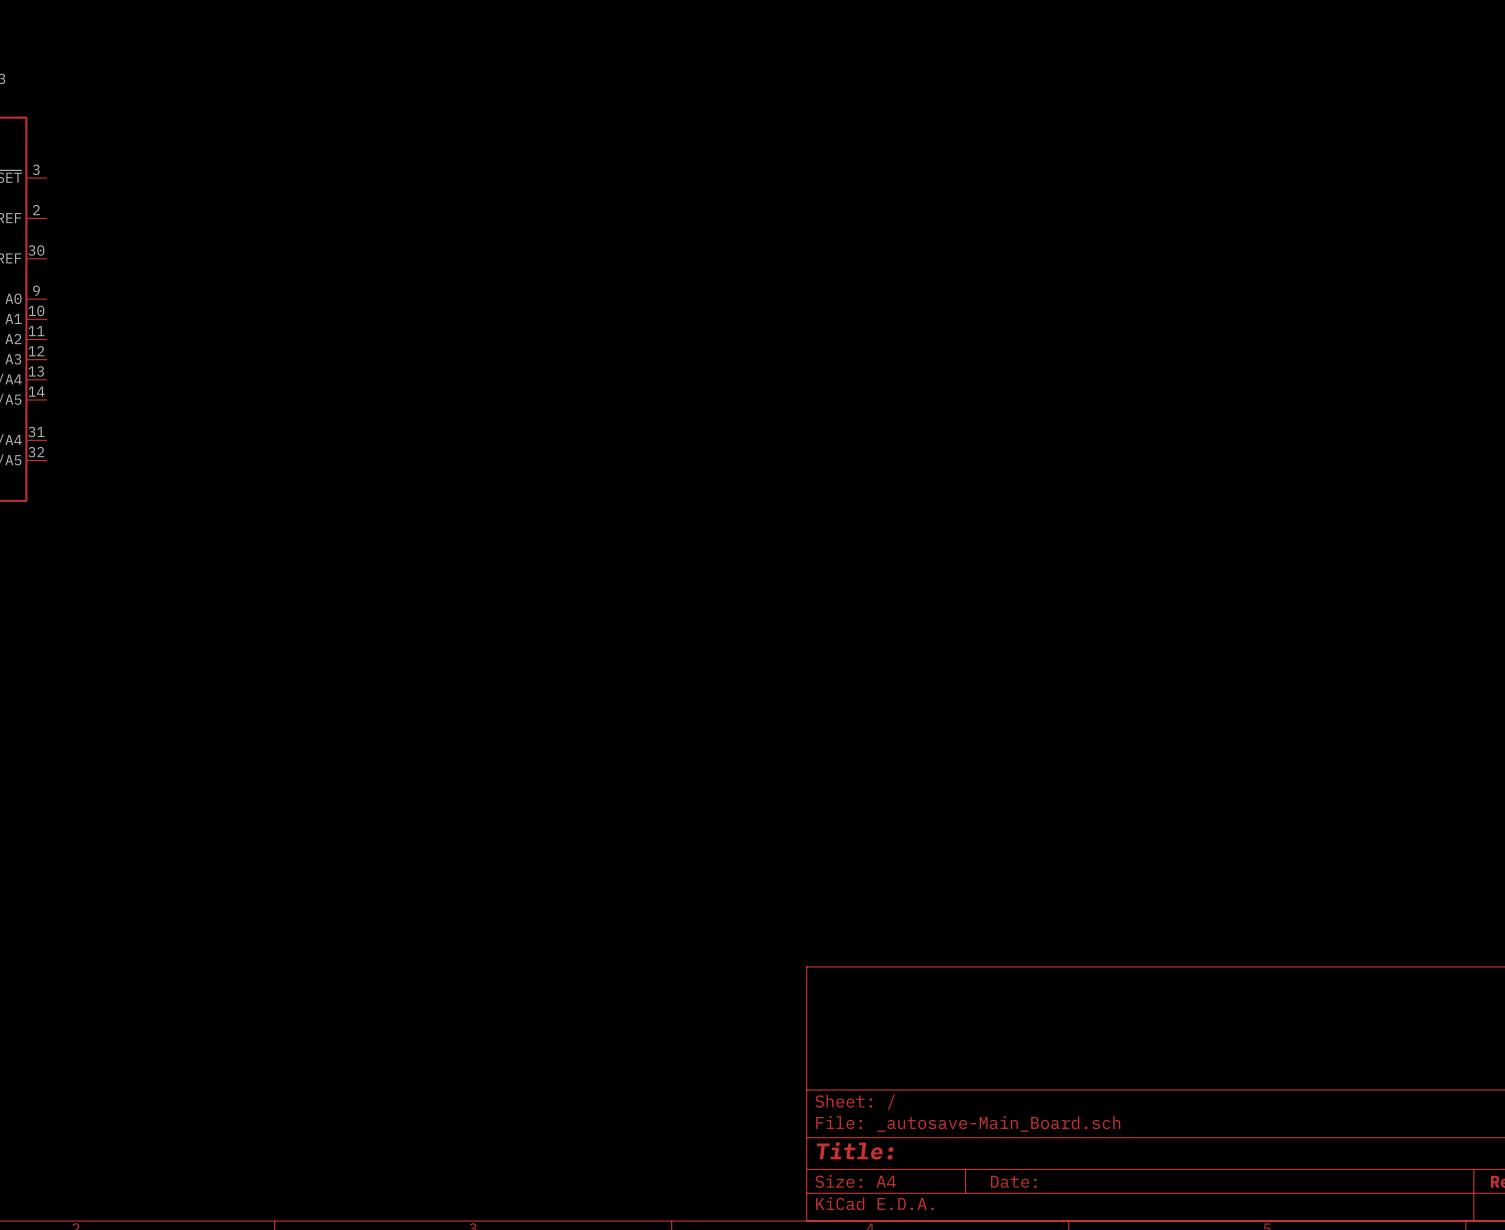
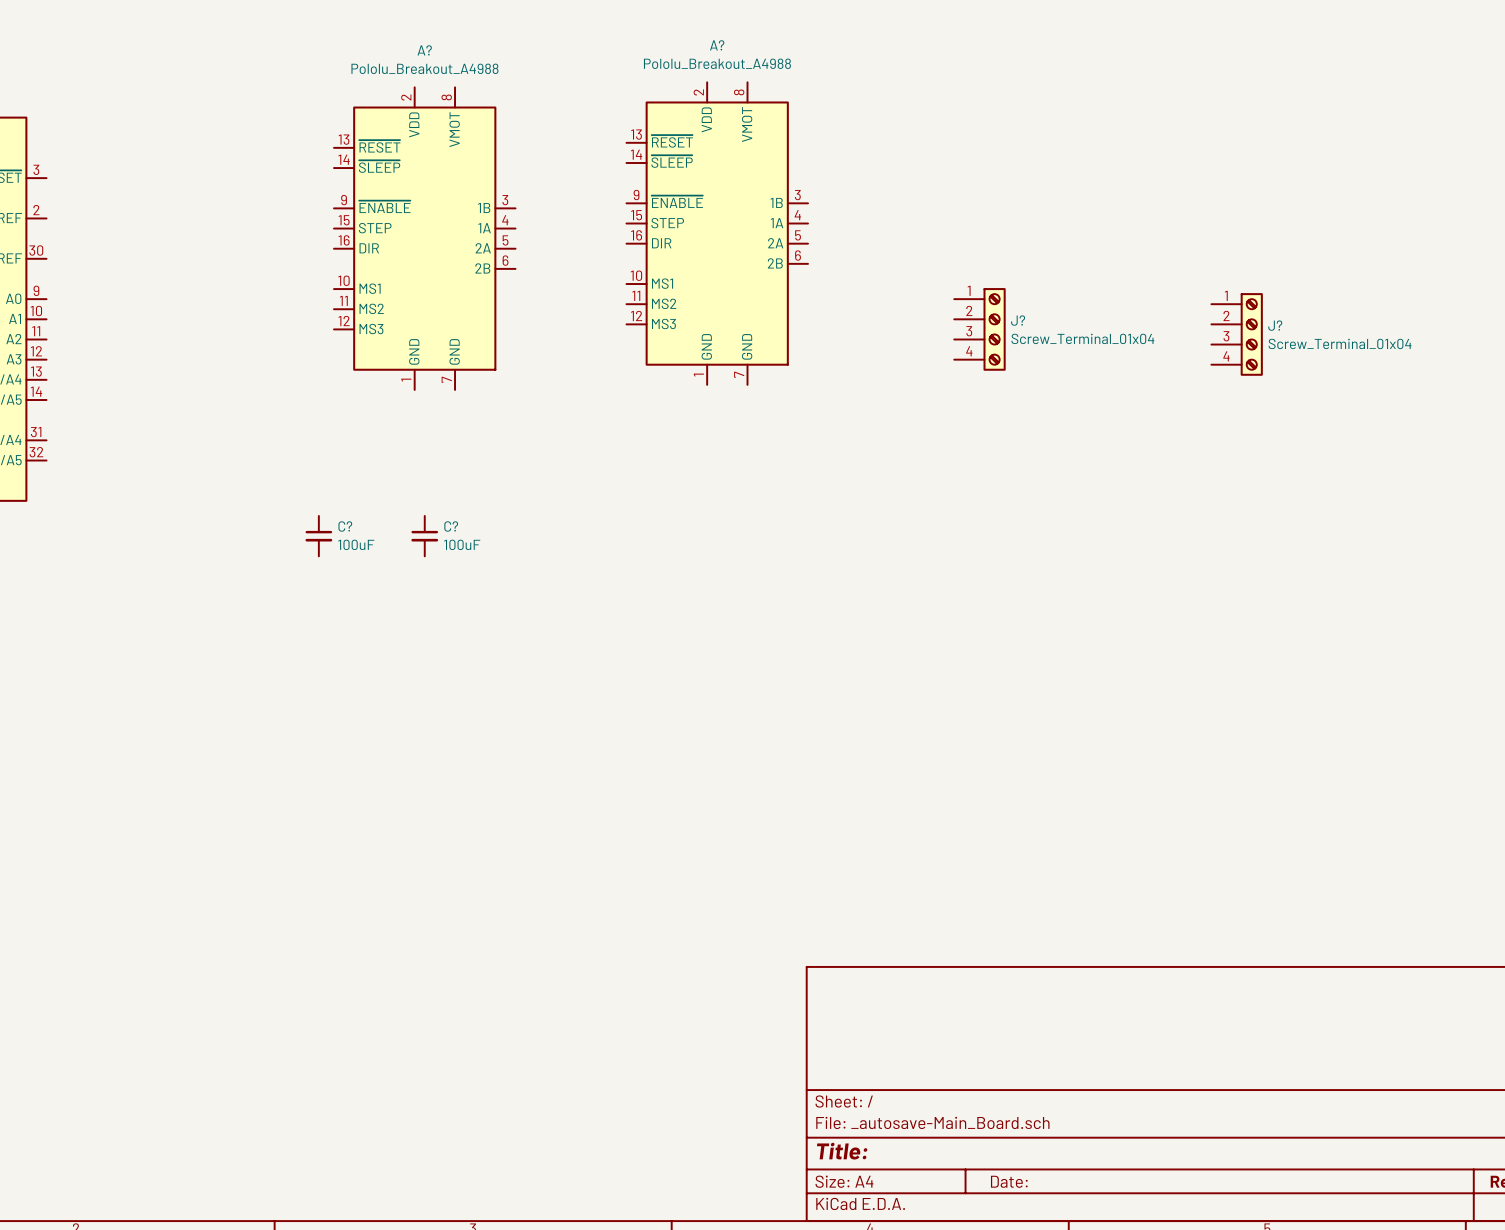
A?: none -> Pololu_Breakout_A4988 (717, 233)
A?: none -> Pololu_Breakout_A4988 (424, 238)
J?: none -> Screw_Terminal_01x04 (979, 329)
J?: none -> Screw_Terminal_01x04 (1237, 334)
C?: none -> 100uF (318, 536)
C?: none -> 100uF (424, 536)

